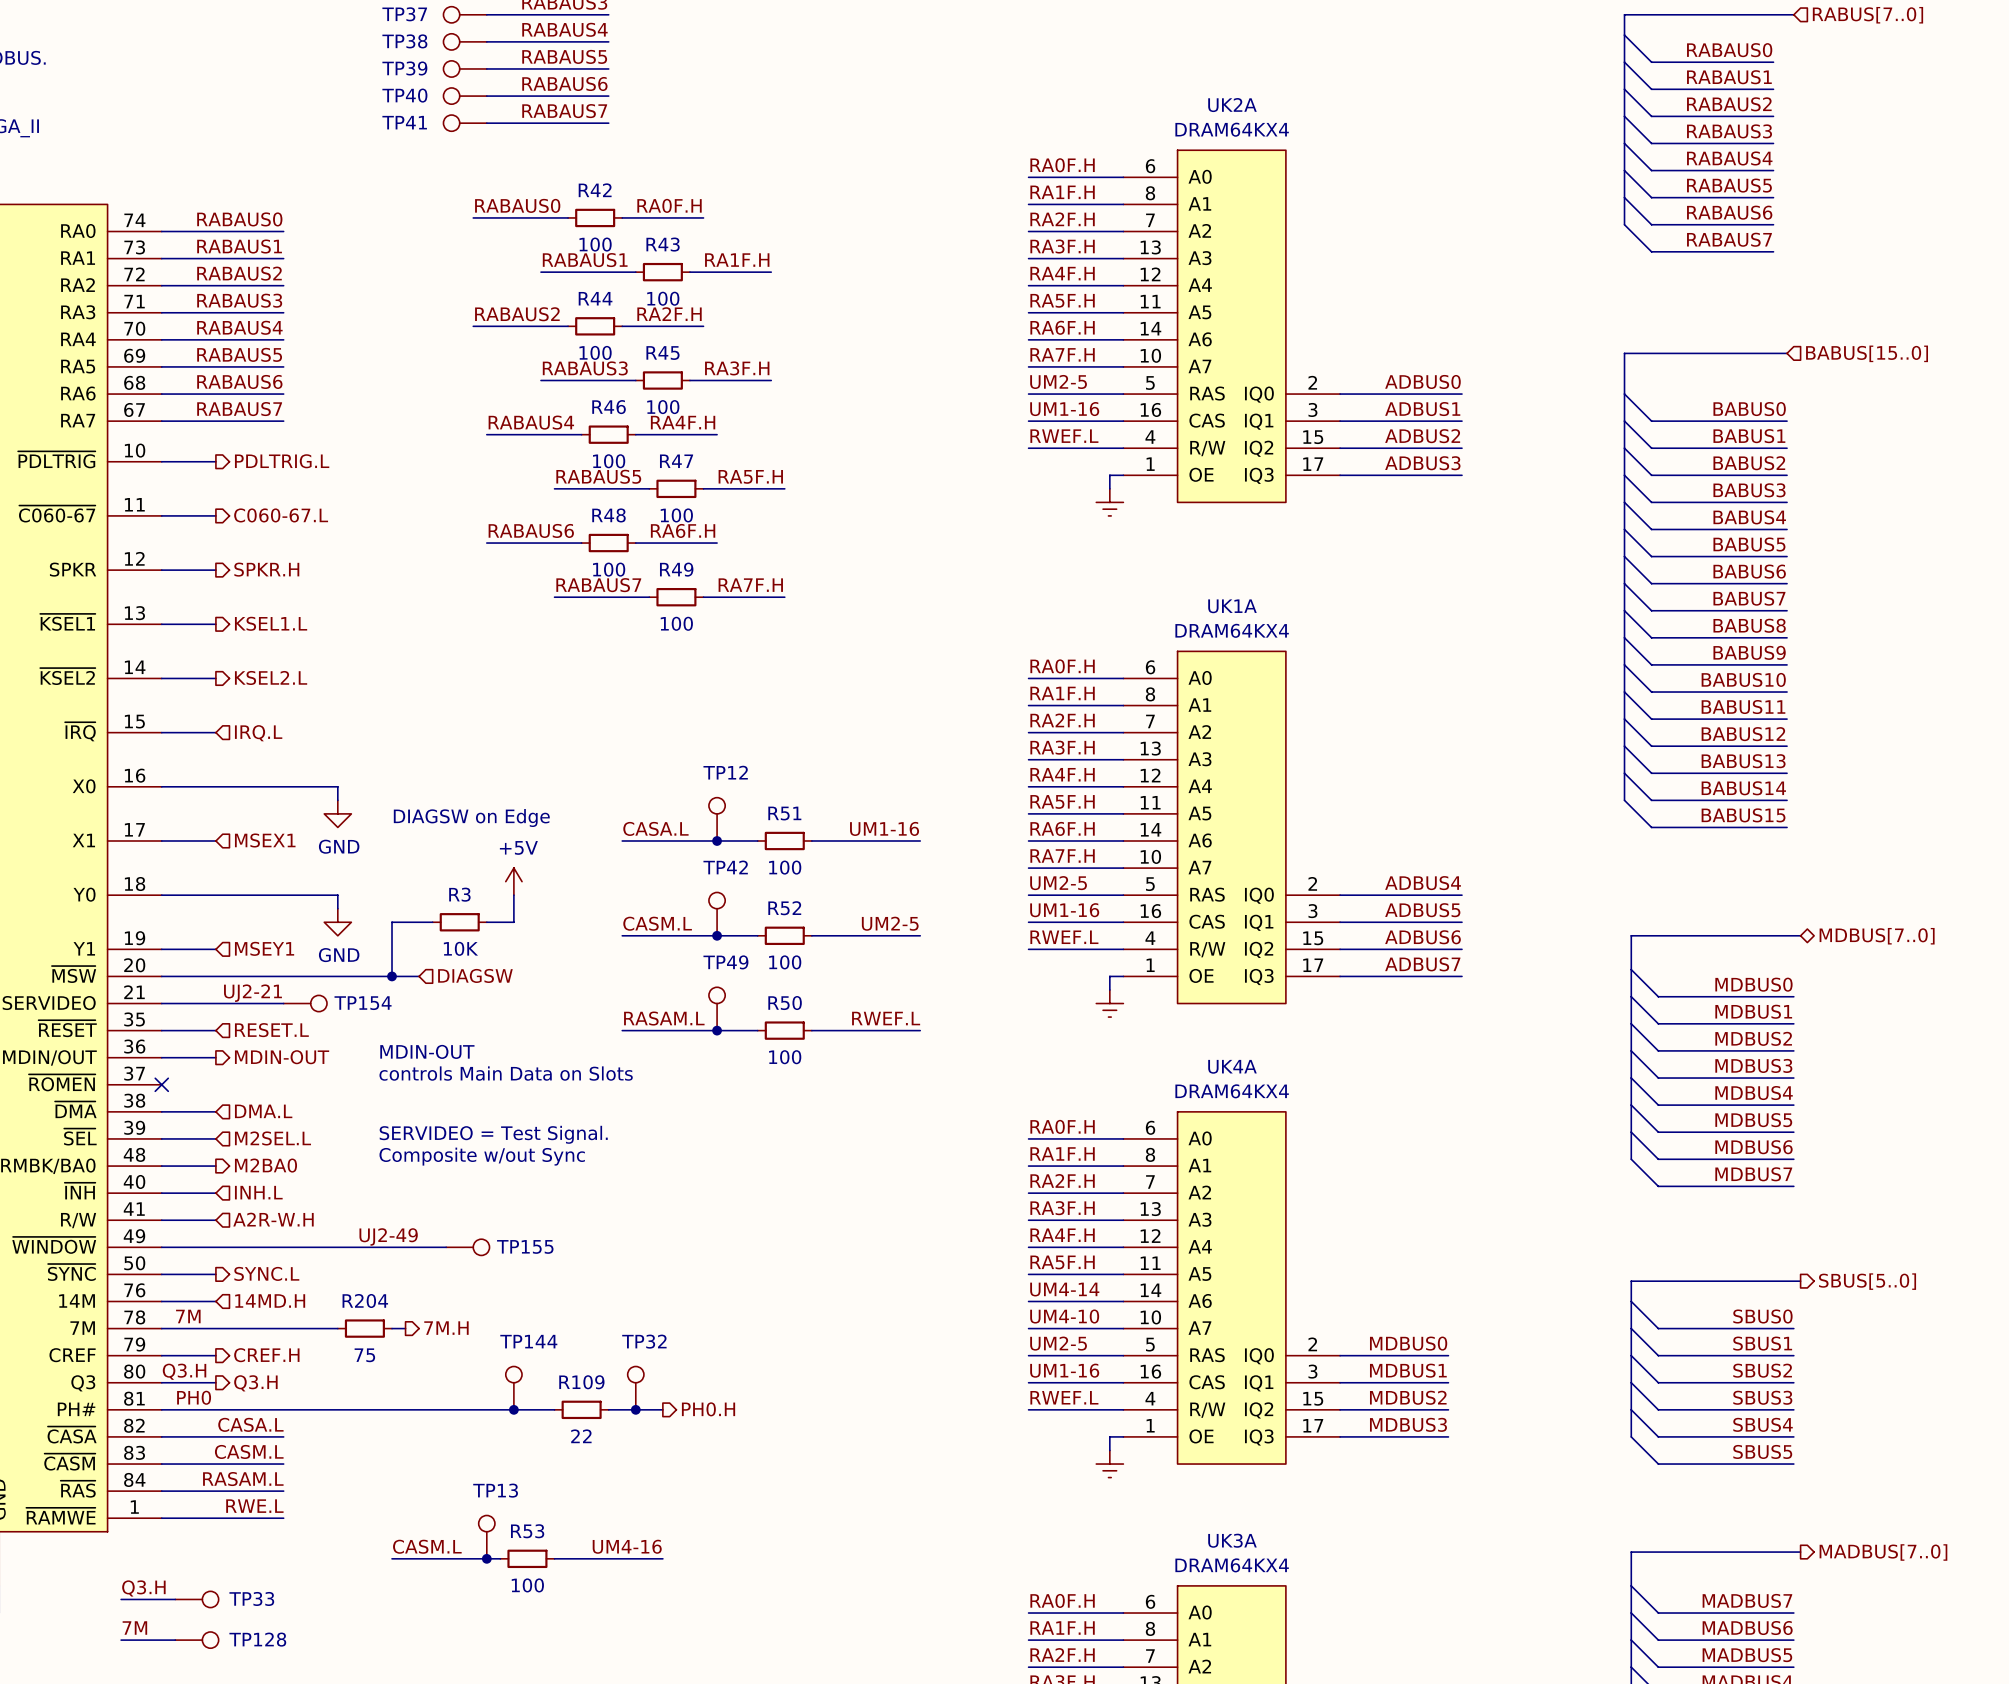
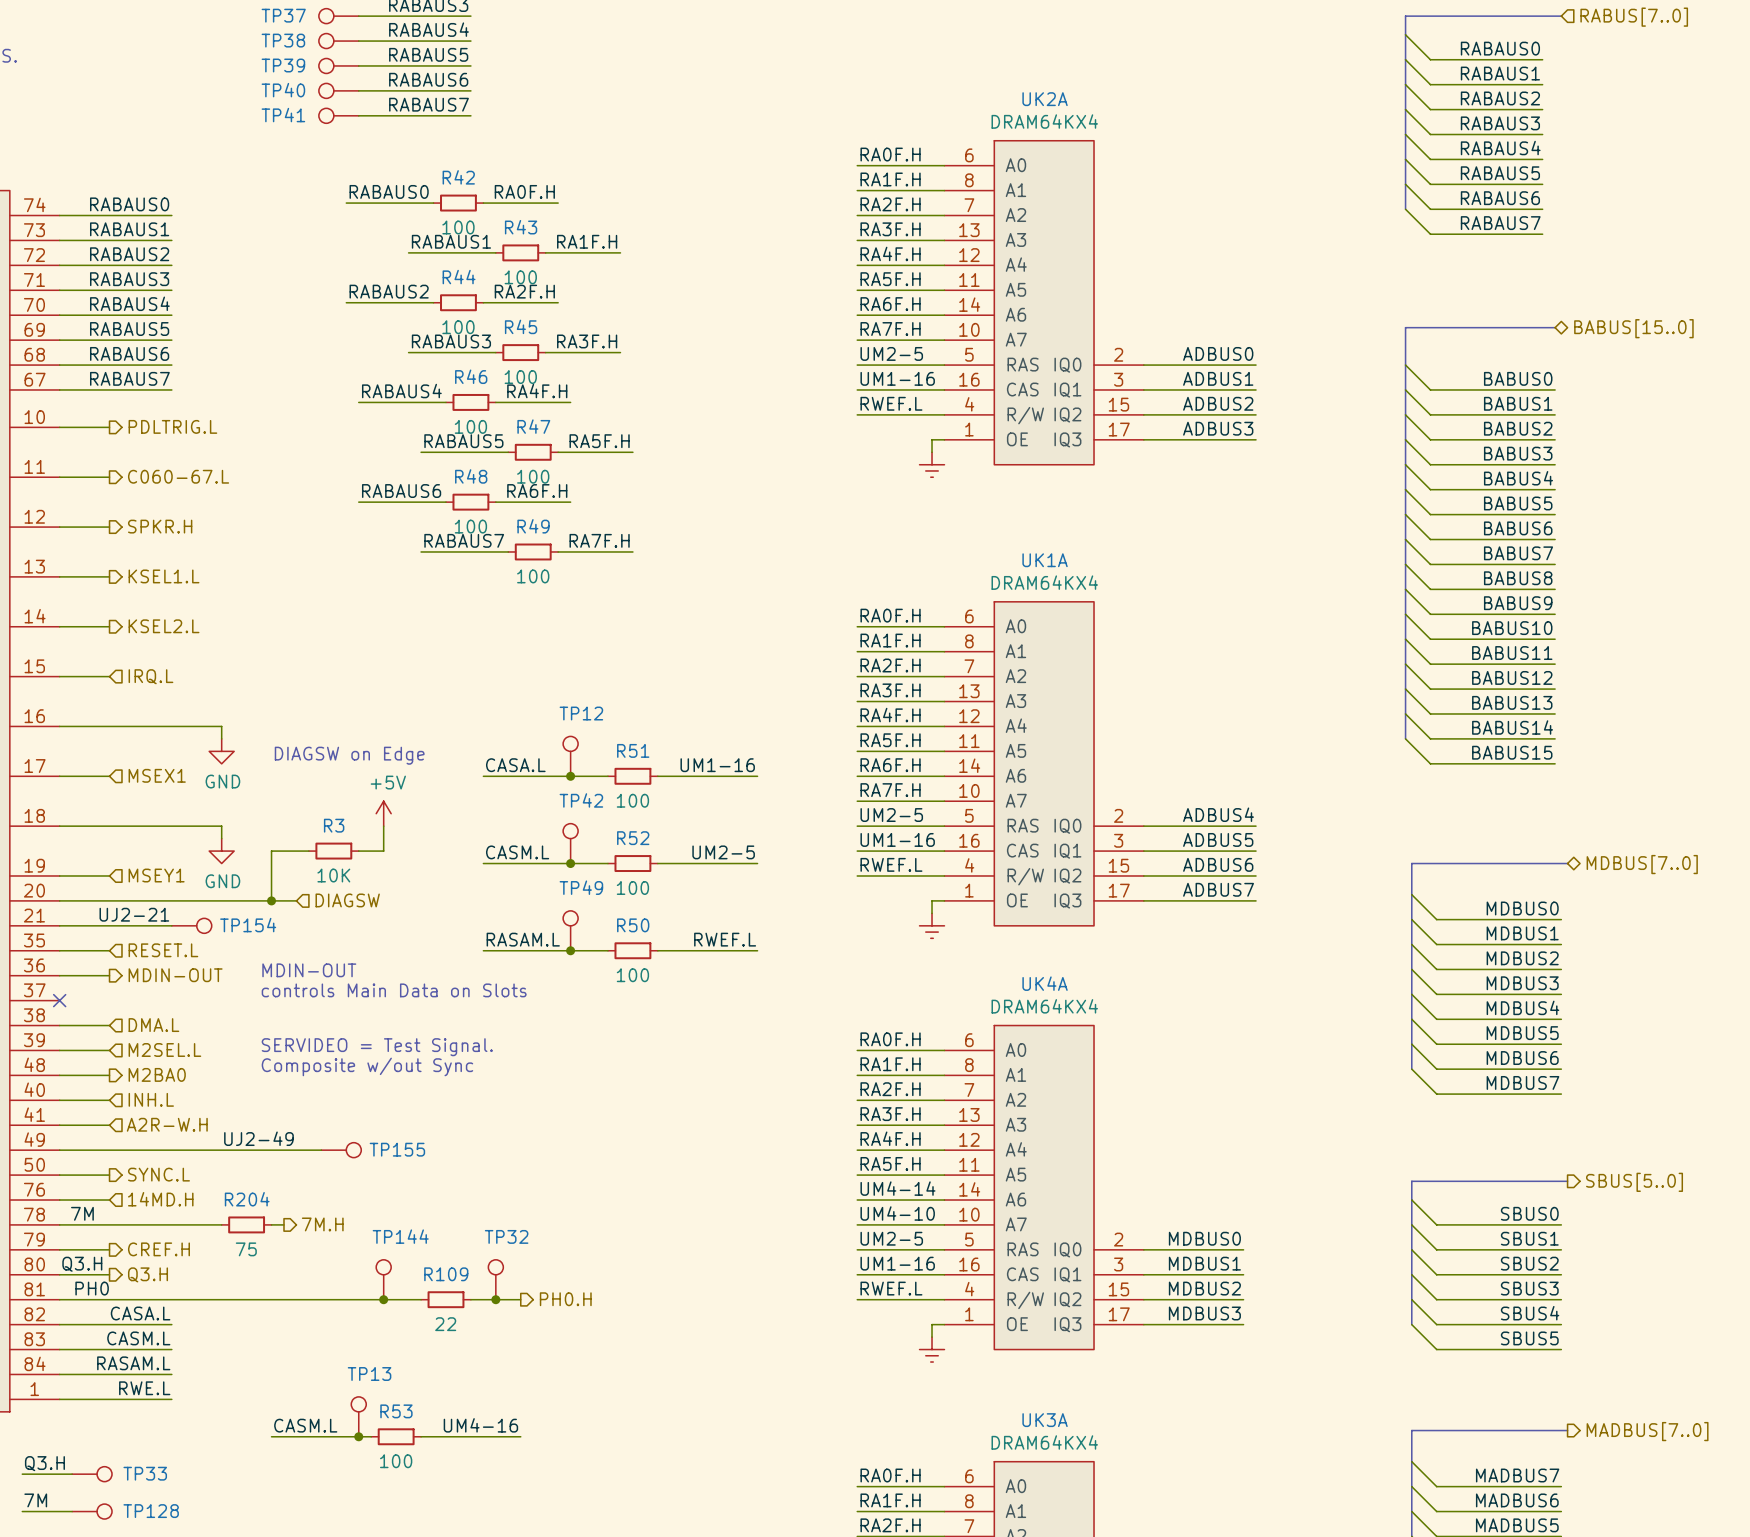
hierarchical label shape: input (1867, 353) -> bidirectional (1633, 328)

